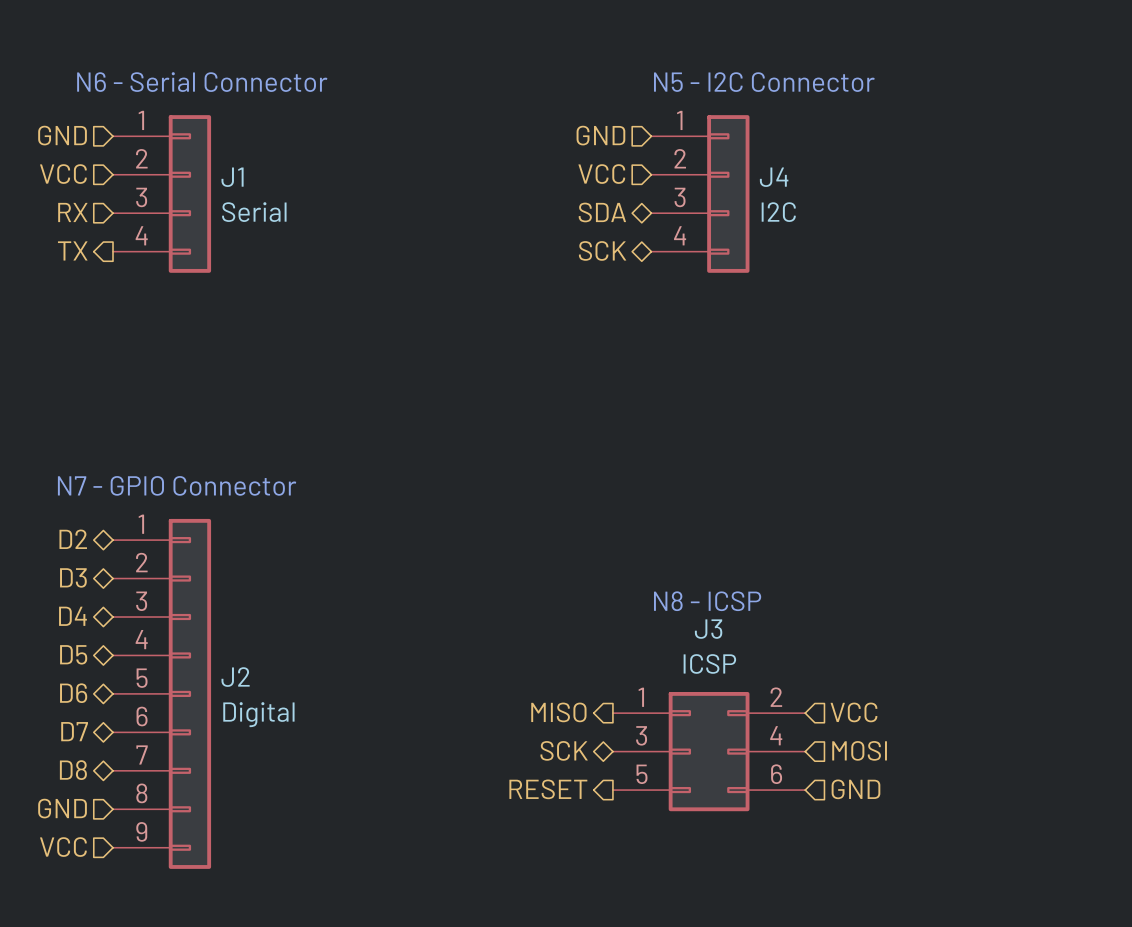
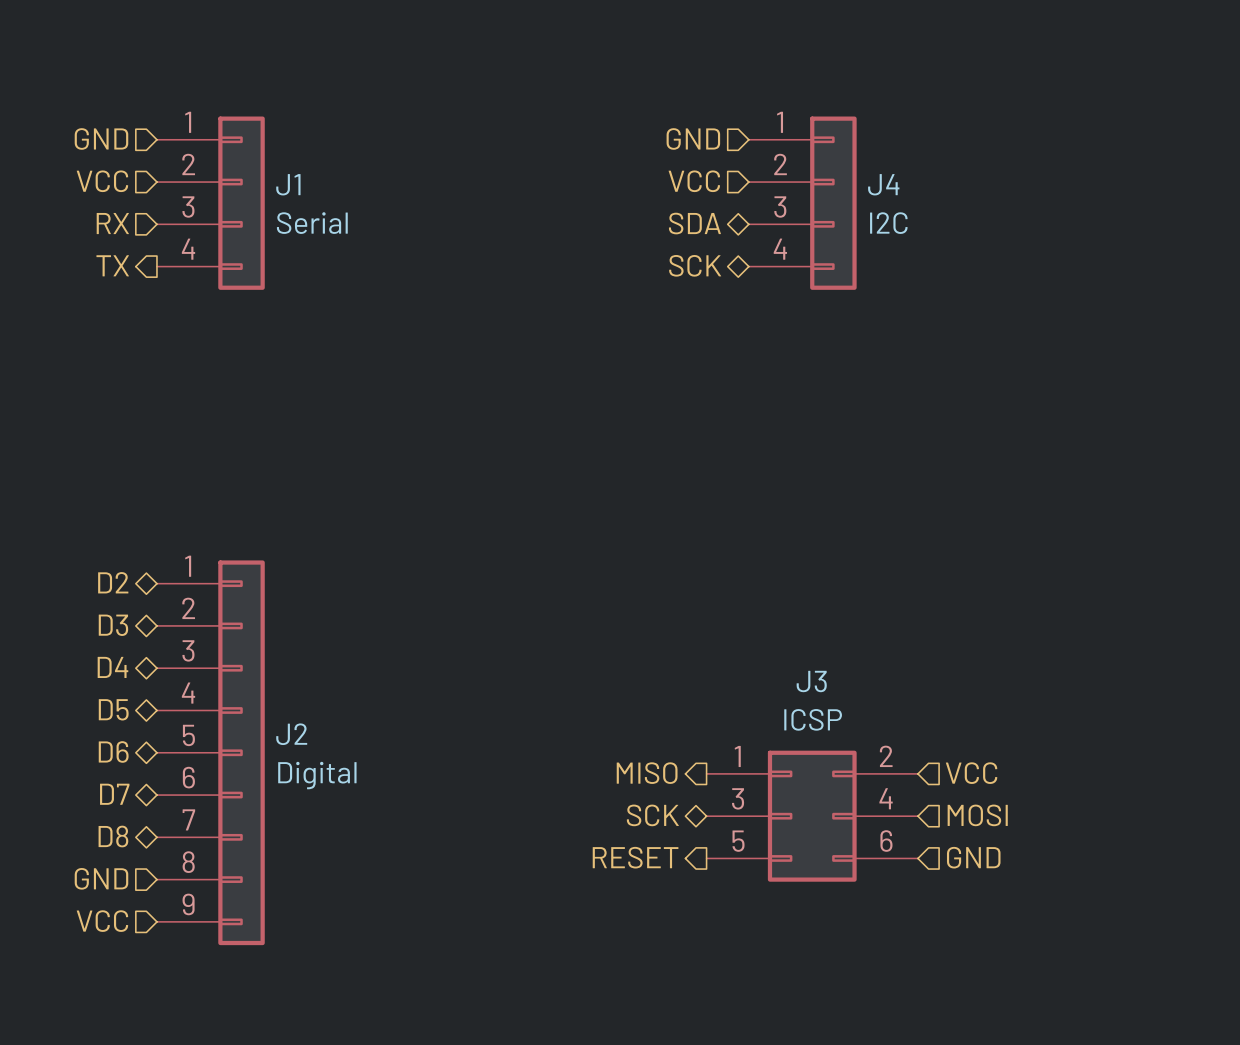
text: N6 - Serial Connector (202, 82) -> none
text: N5 - I2C Connector (764, 82) -> none
text: N7 - GPIO Connector (177, 485) -> none
text: N8 - ICSP (707, 601) -> none

